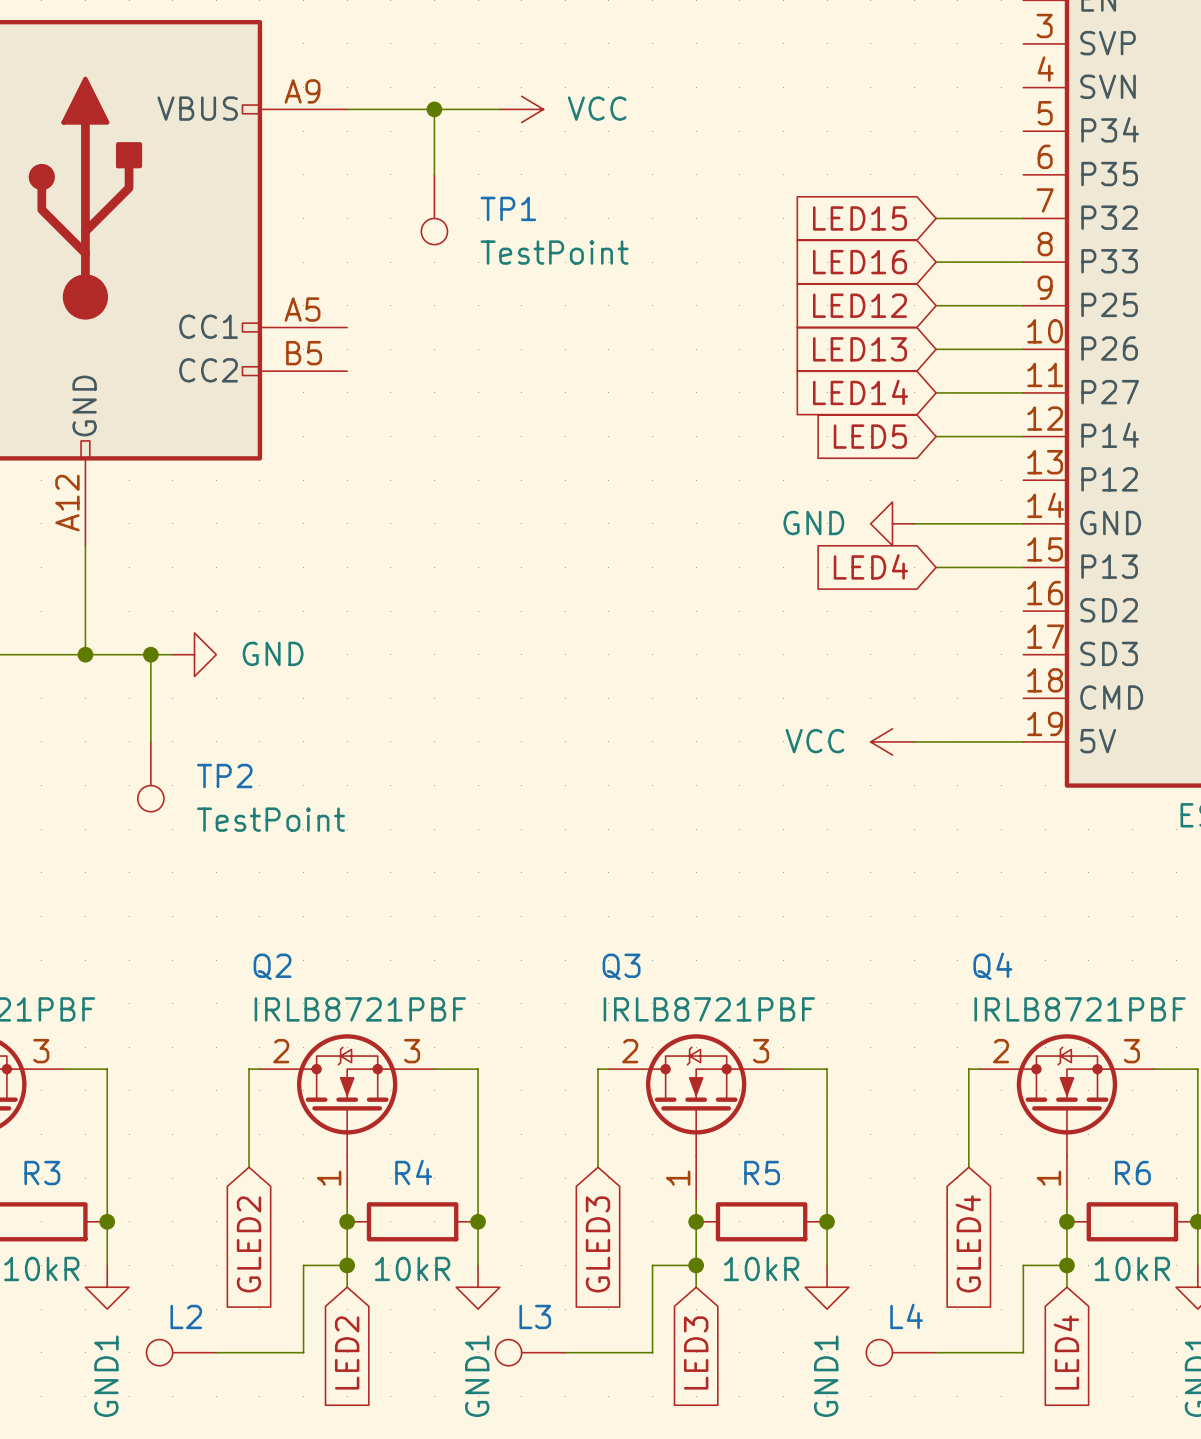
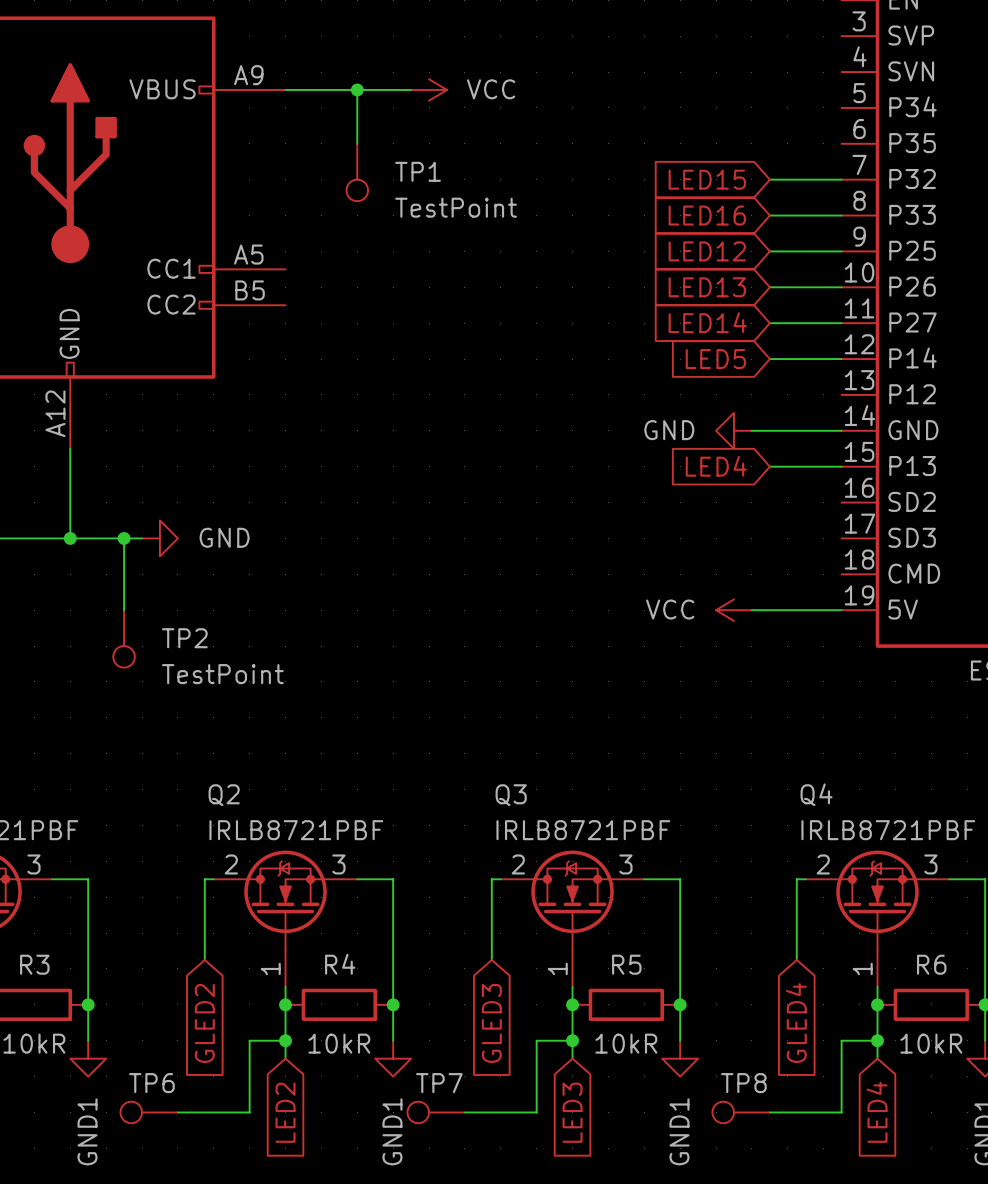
L2 name: L2 (186, 1316) -> TP6 (151, 1083)
L3 name: L3 (535, 1316) -> TP7 (439, 1083)
L4 name: L4 (906, 1316) -> TP8 (743, 1083)

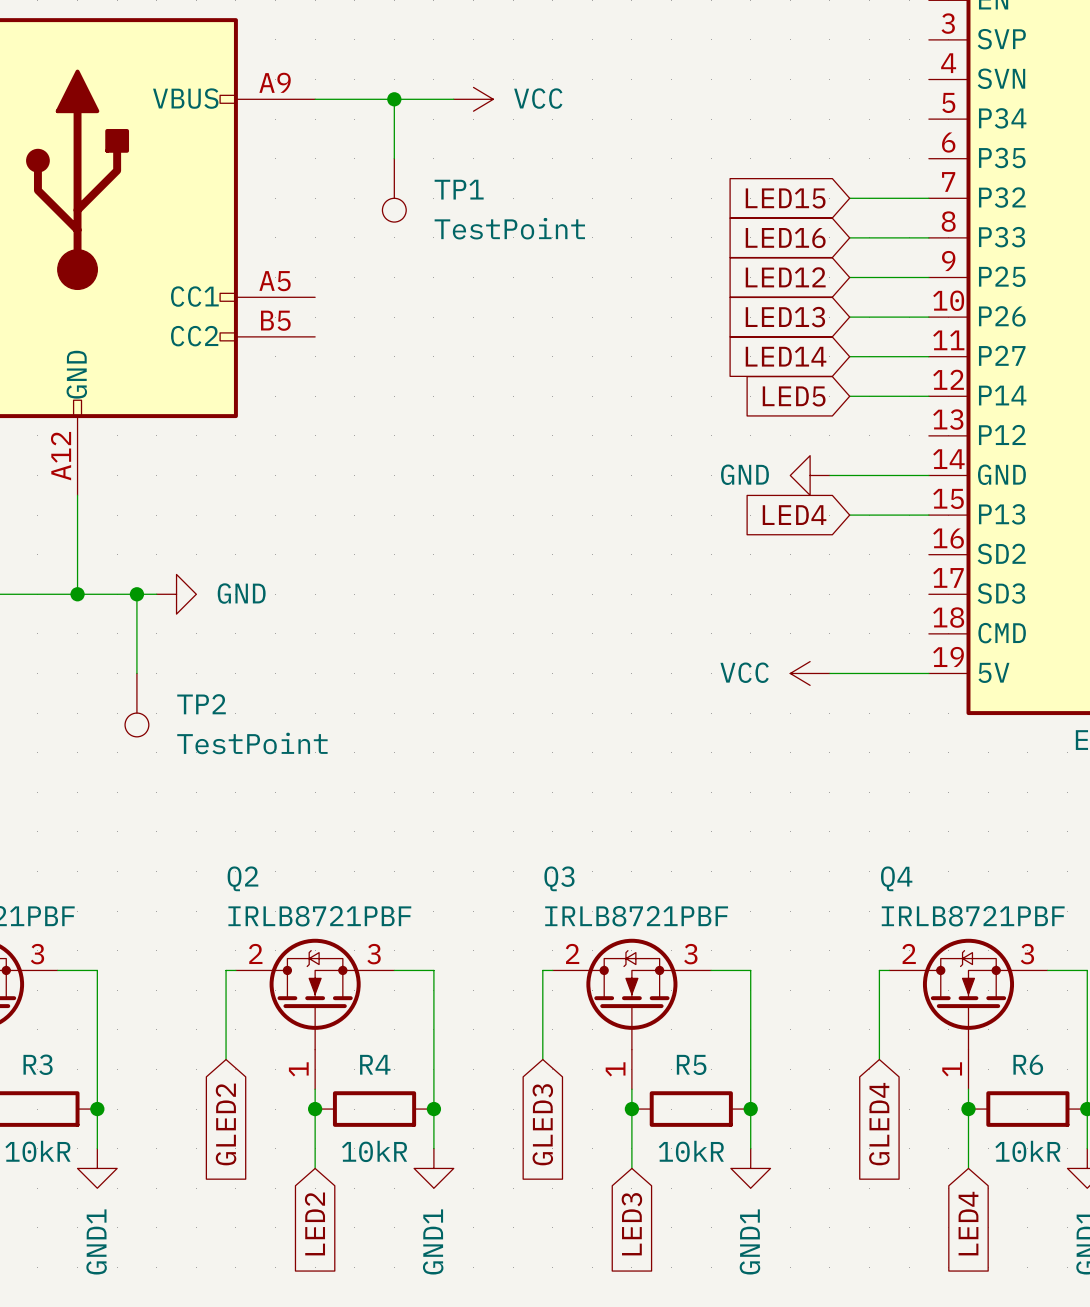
wire: (285, 1040) (249, 1040) (249, 1112) (177, 1112) -> none
junction: (285, 1040) -> none
wire: (572, 1040) (536, 1040) (536, 1112) (464, 1112) -> none
junction: (572, 1040) -> none
wire: (877, 1040) (841, 1040) (841, 1112) (769, 1112) -> none
junction: (877, 1040) -> none
TP6: (149, 1112) -> none
TP7: (436, 1112) -> none
TP8: (741, 1112) -> none

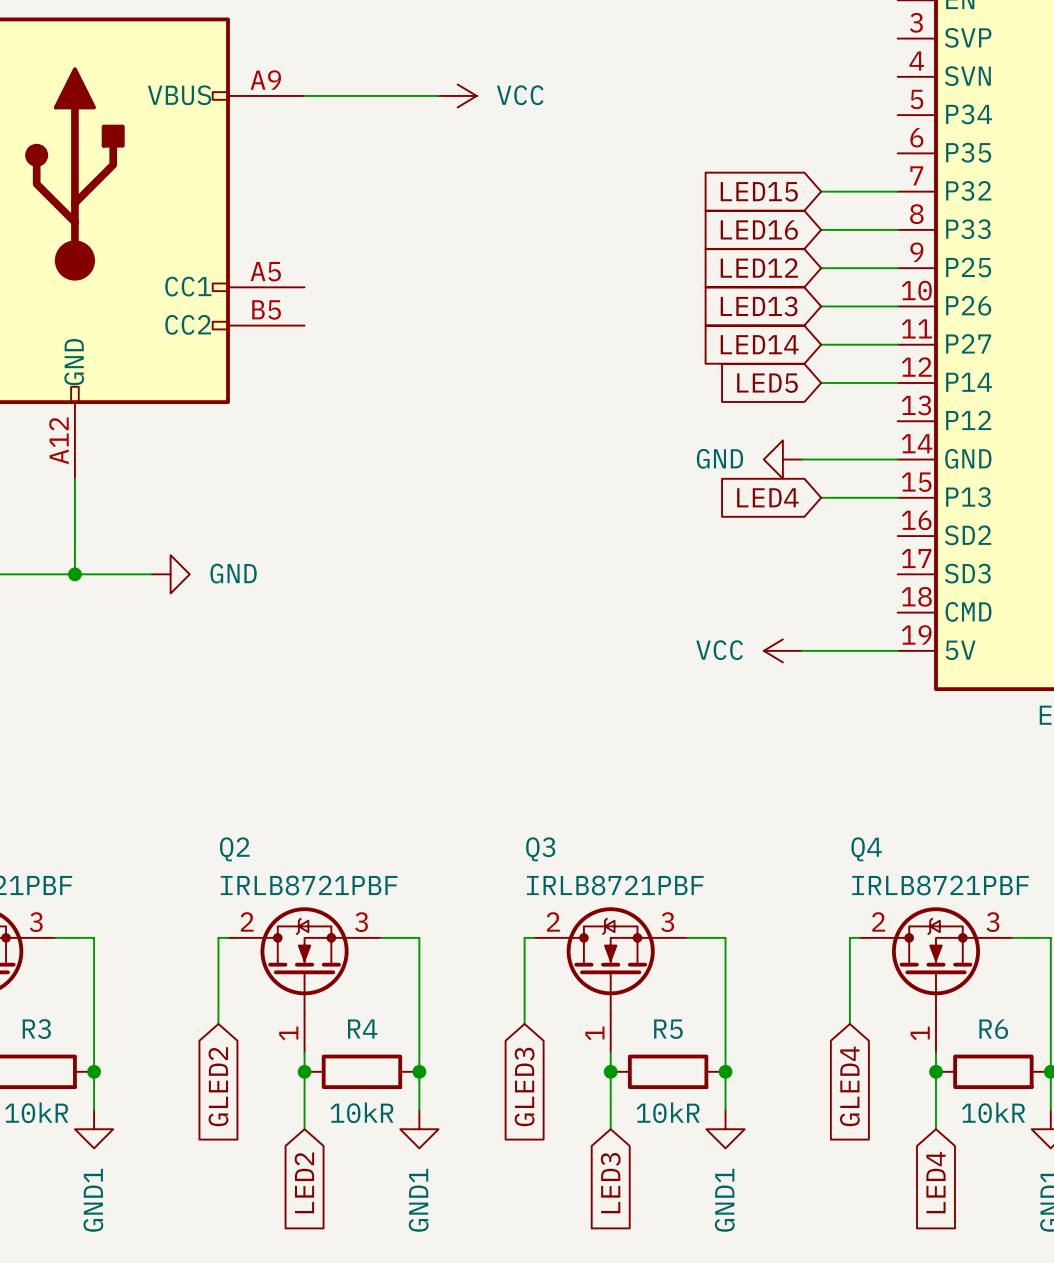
wire: (394, 99) (394, 158) -> none
junction: (394, 99) -> none
TP1: TestPoint (394, 190) -> none
wire: (136, 594) (136, 673) -> none
junction: (136, 594) -> none
TP2: TestPoint (136, 705) -> none

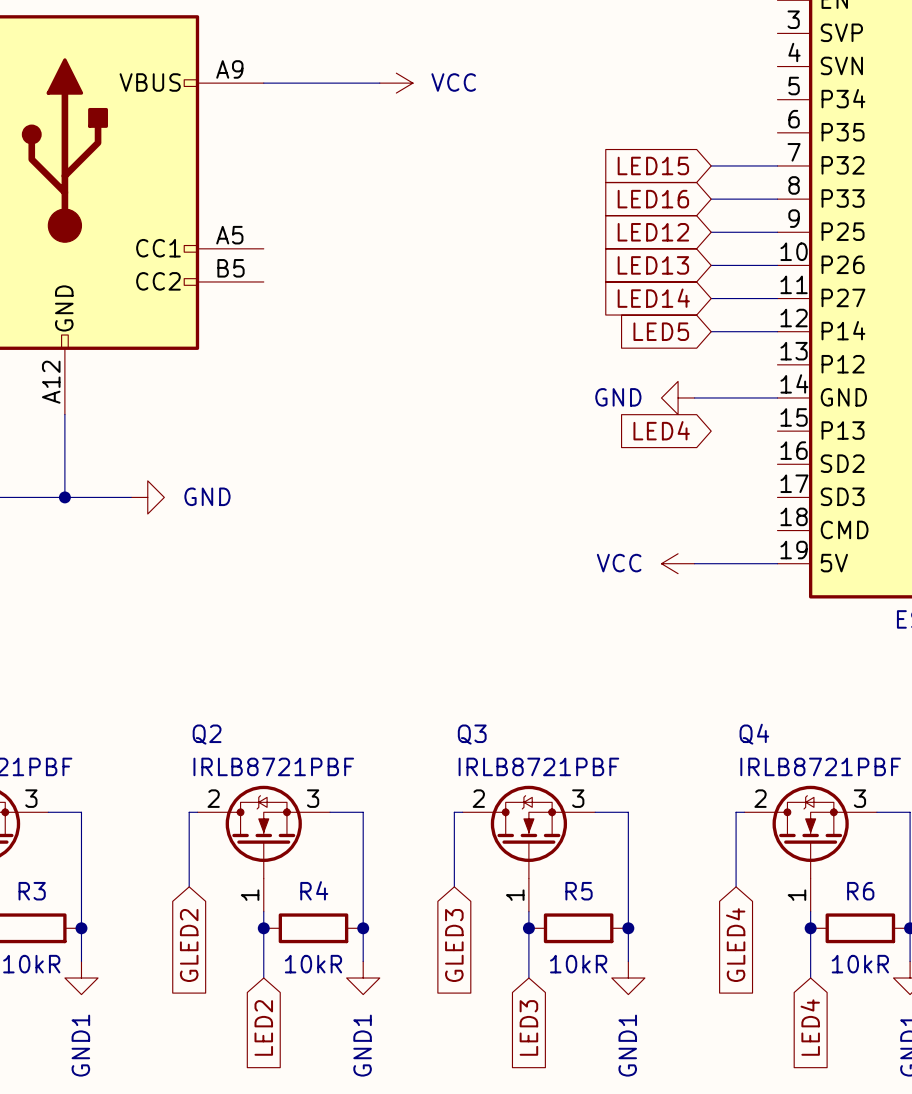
wire: (821, 497) (897, 497) -> none

